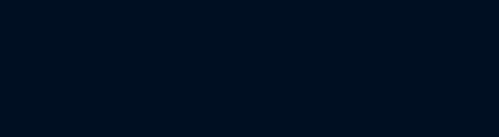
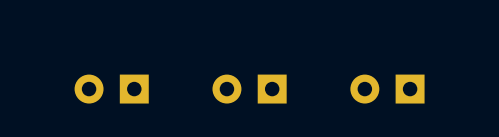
part: none -> (111, 89)
part: none -> (249, 89)
part: none -> (387, 89)

